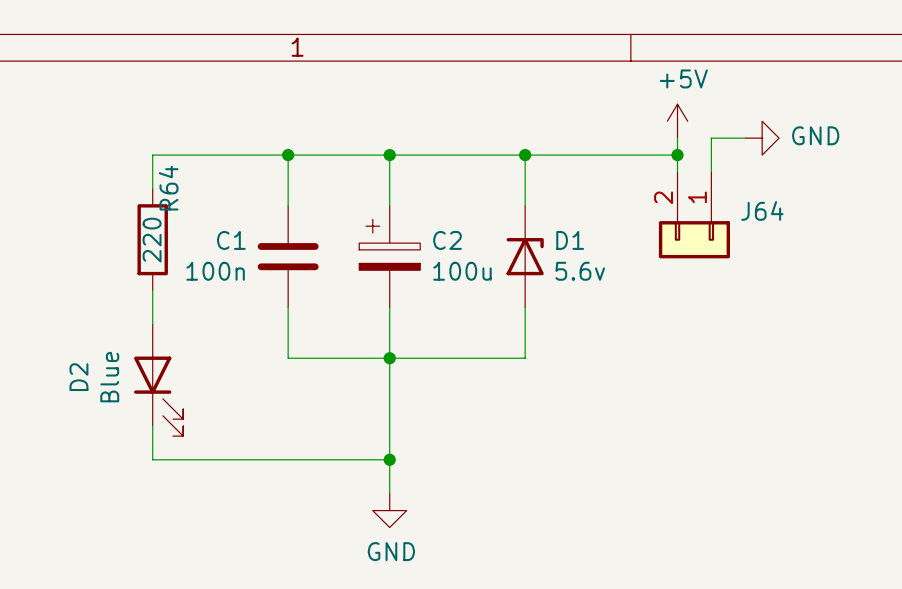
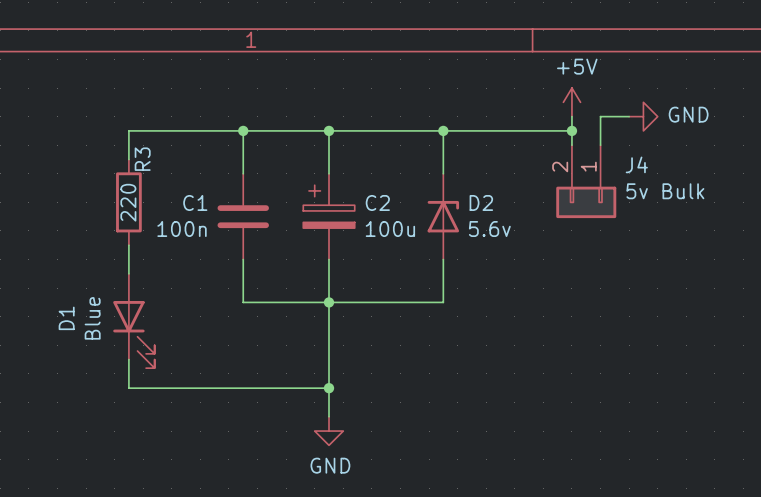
R64 name: R64 (168, 188) -> R3 (142, 159)
J64 name: J64 (762, 210) -> J4 (636, 164)
J64 text: none -> 5v Bulk (665, 191)
D1 name: D1 (570, 240) -> D2 (481, 202)
D2 name: D2 (78, 377) -> D1 (66, 318)

